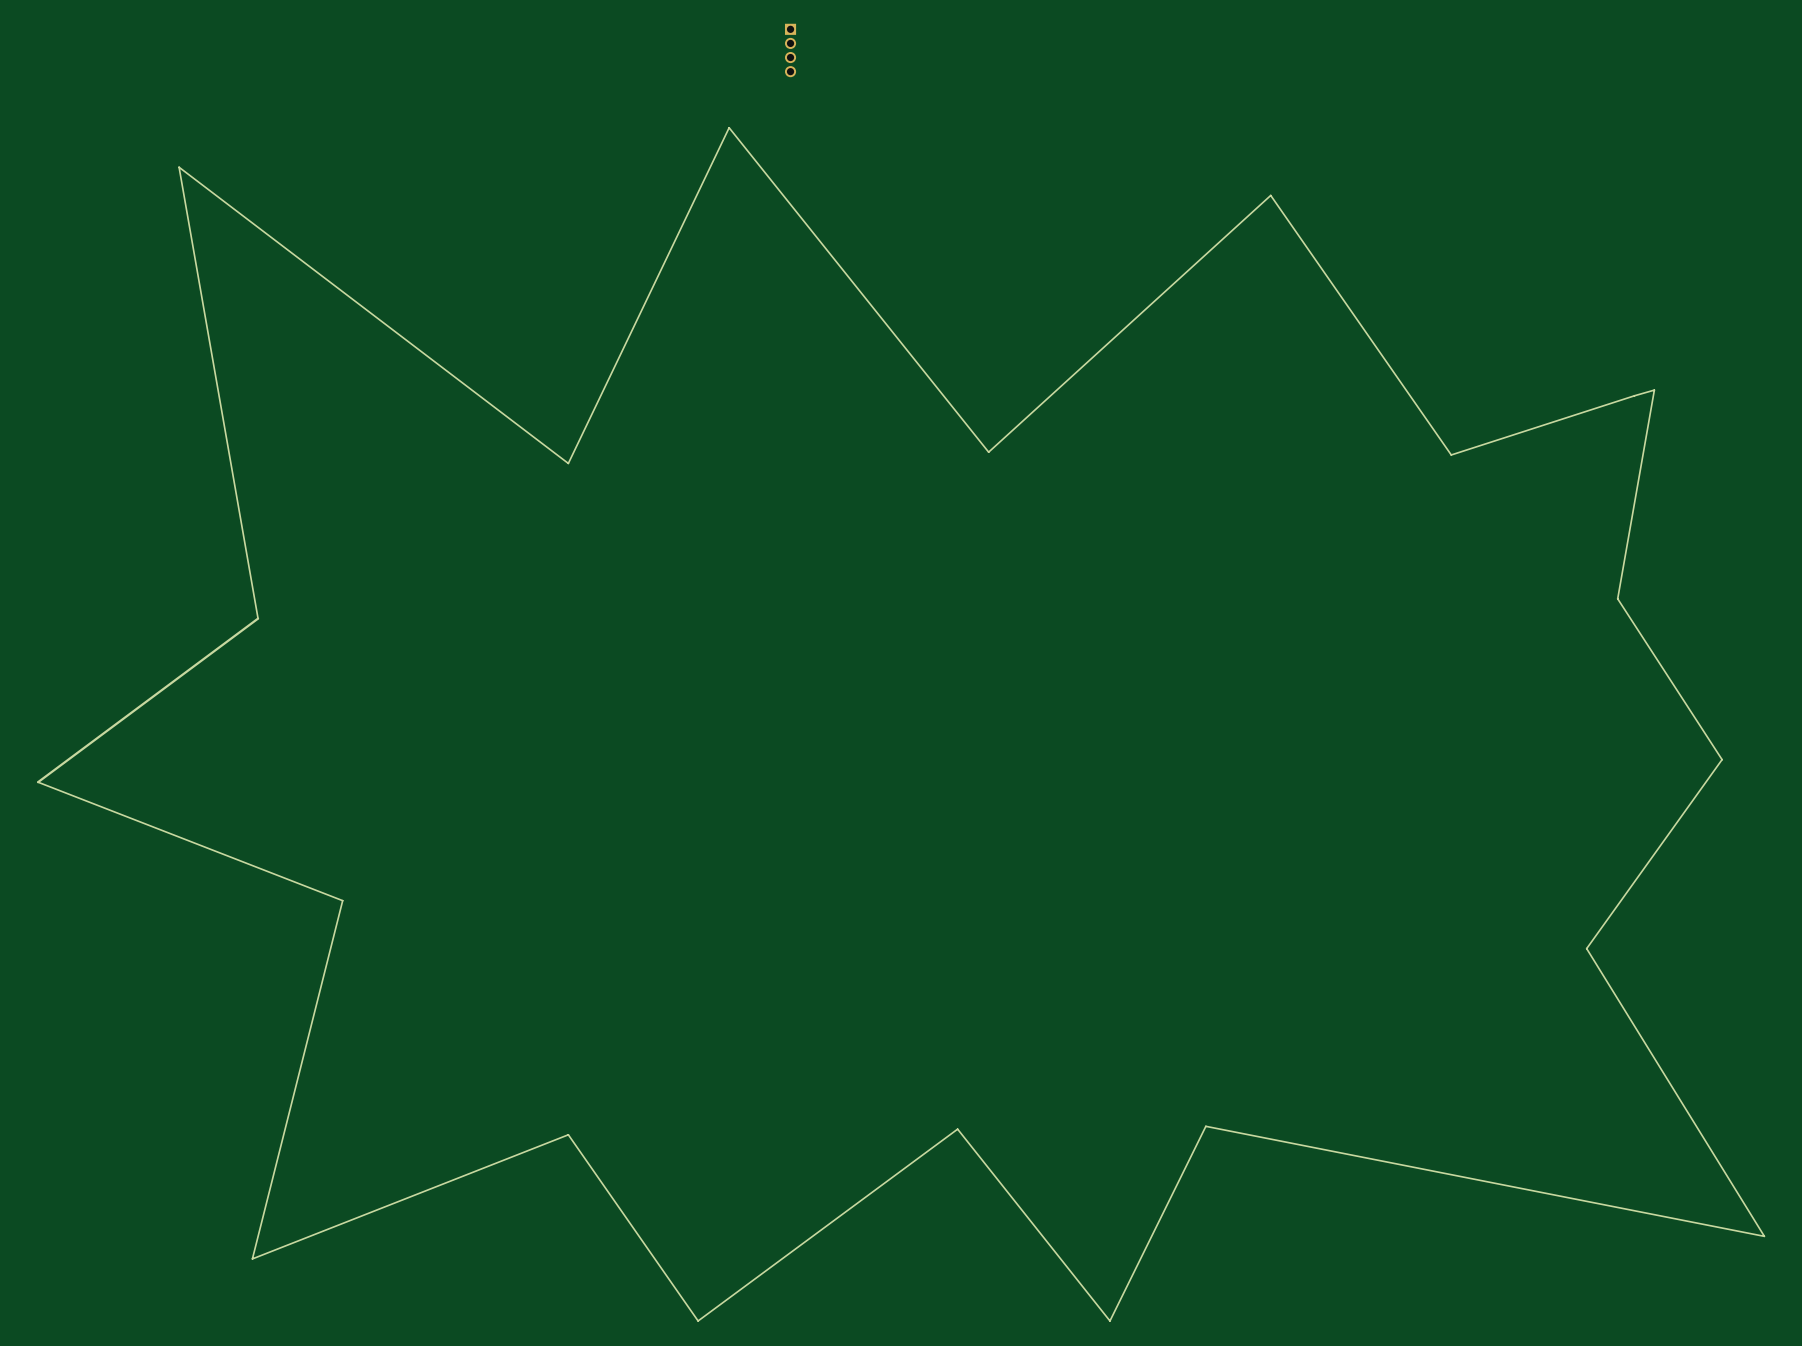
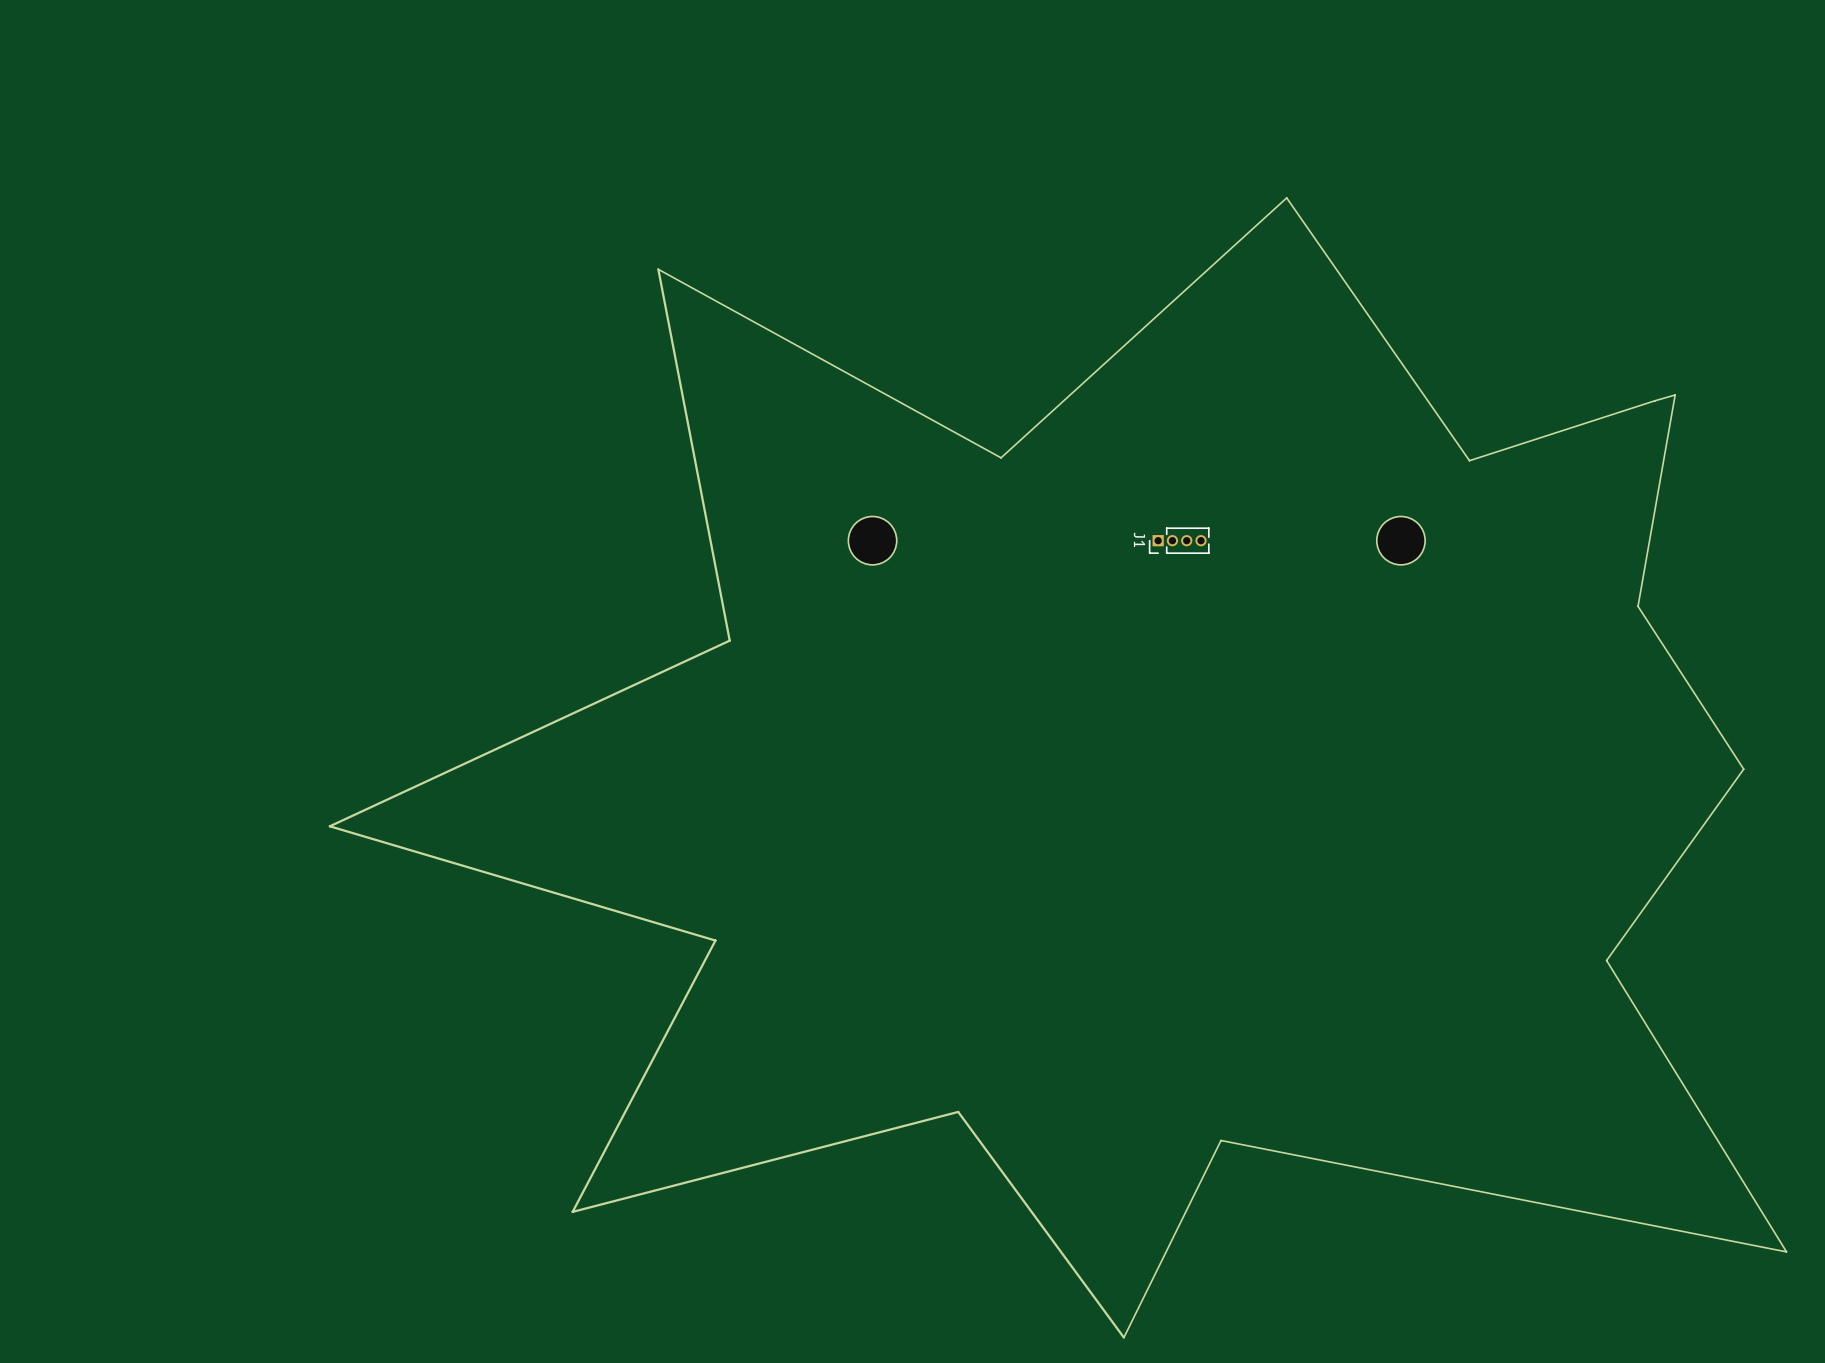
part: (790, 50) -> none
board edge: (988, 452) (729, 127) (568, 463) (179, 167) (258, 618) (38, 782) (342, 900) (252, 1258) (568, 1134) (698, 1320) (957, 1129) (1109, 1320) -> (1001, 457) (658, 269) (729, 640) (329, 826) (715, 940) (572, 1211) (958, 1111) (1123, 1337)
part: none -> (872, 540)
J1: none -> (1179, 540)
part: none -> (1400, 540)

